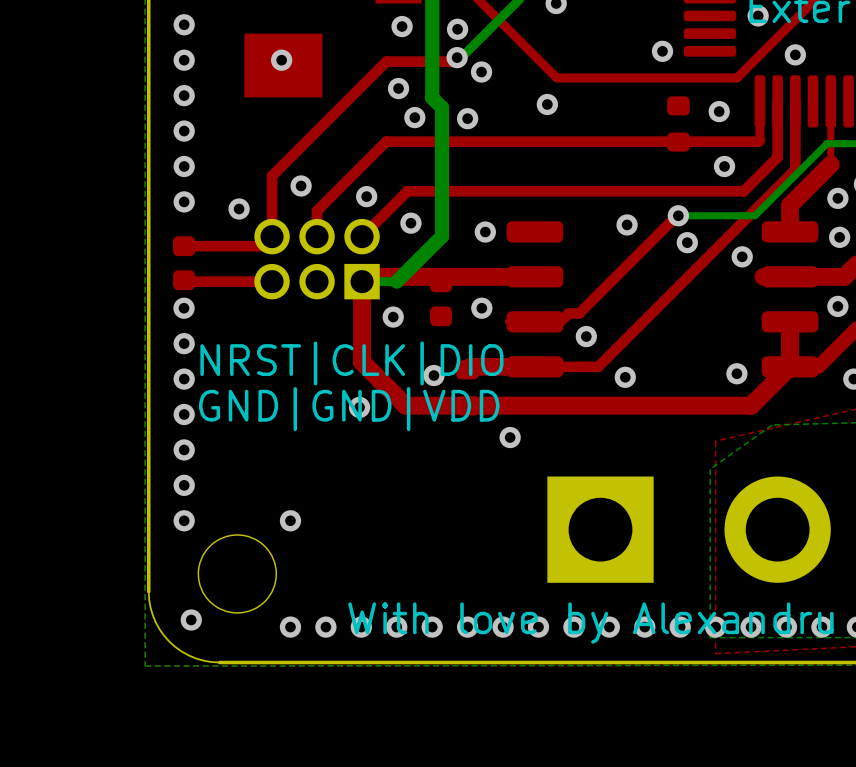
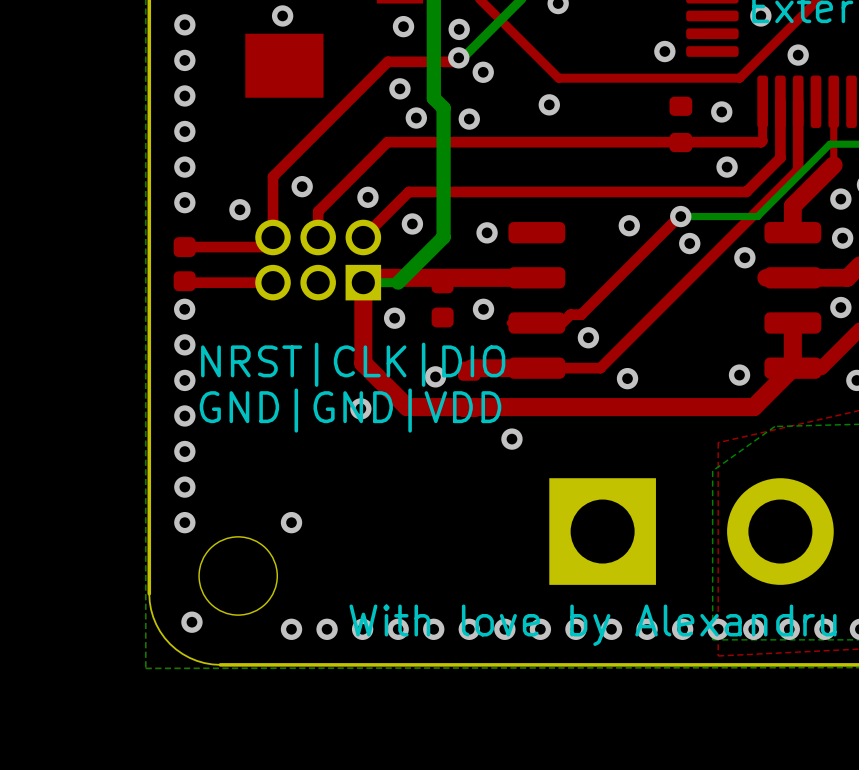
via position: (281, 60) -> (282, 15)

